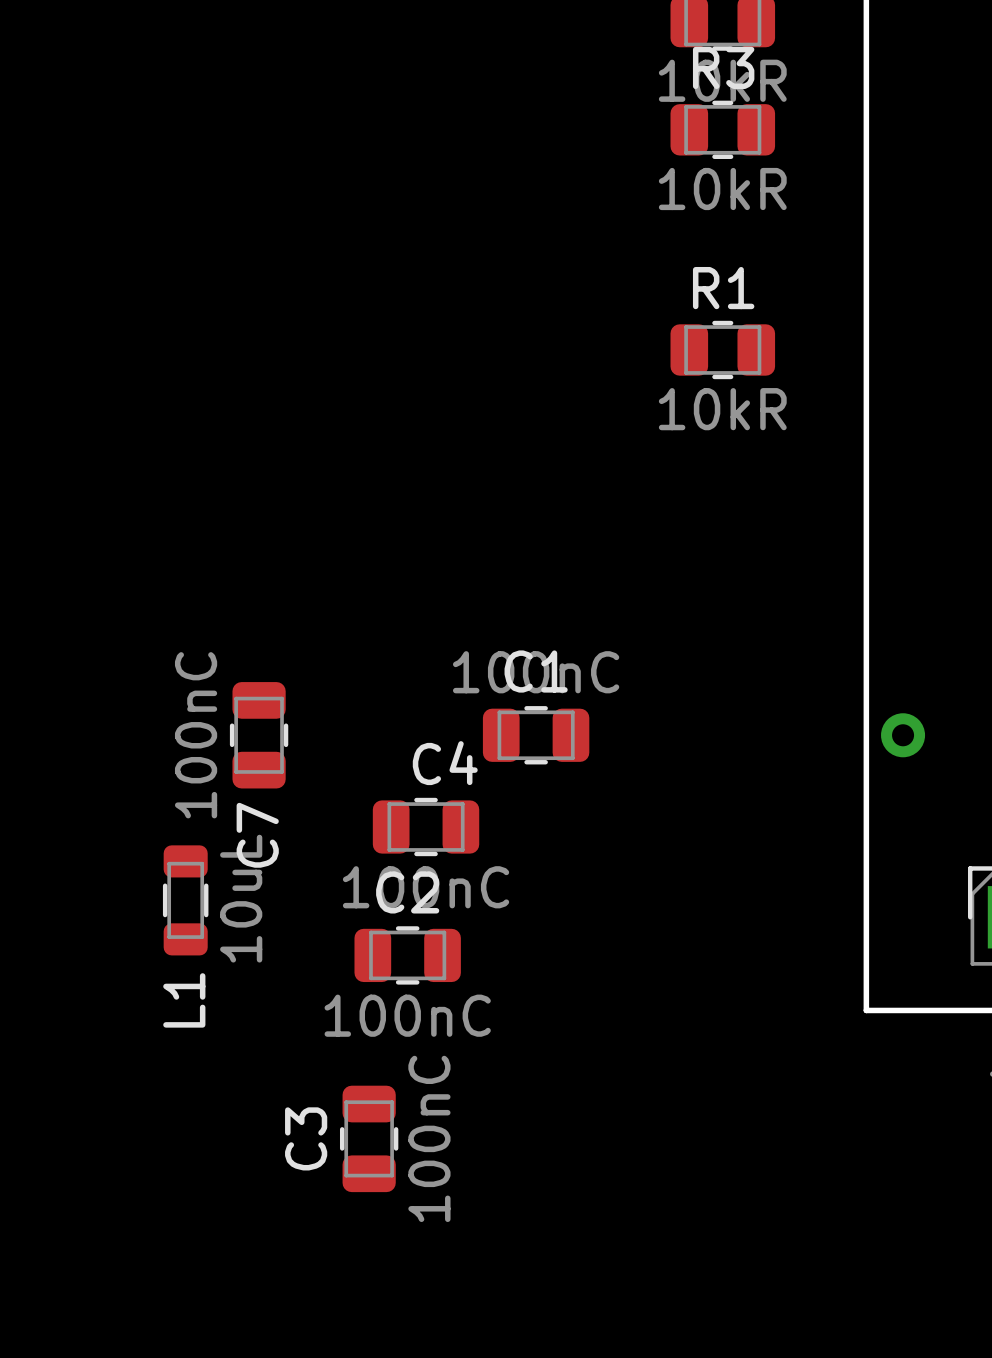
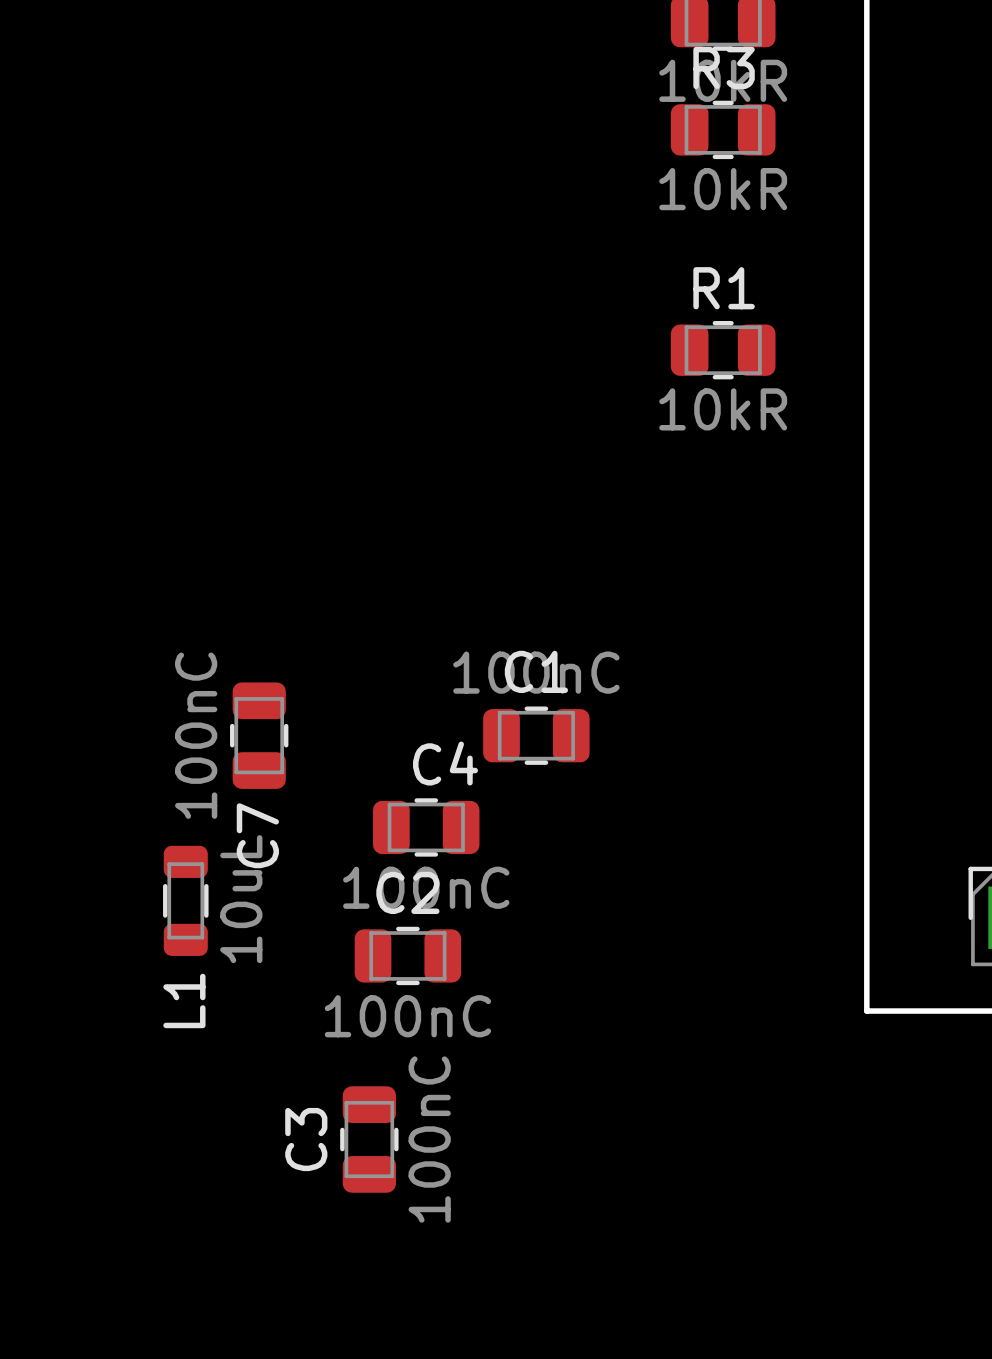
via: (903, 735) -> none

